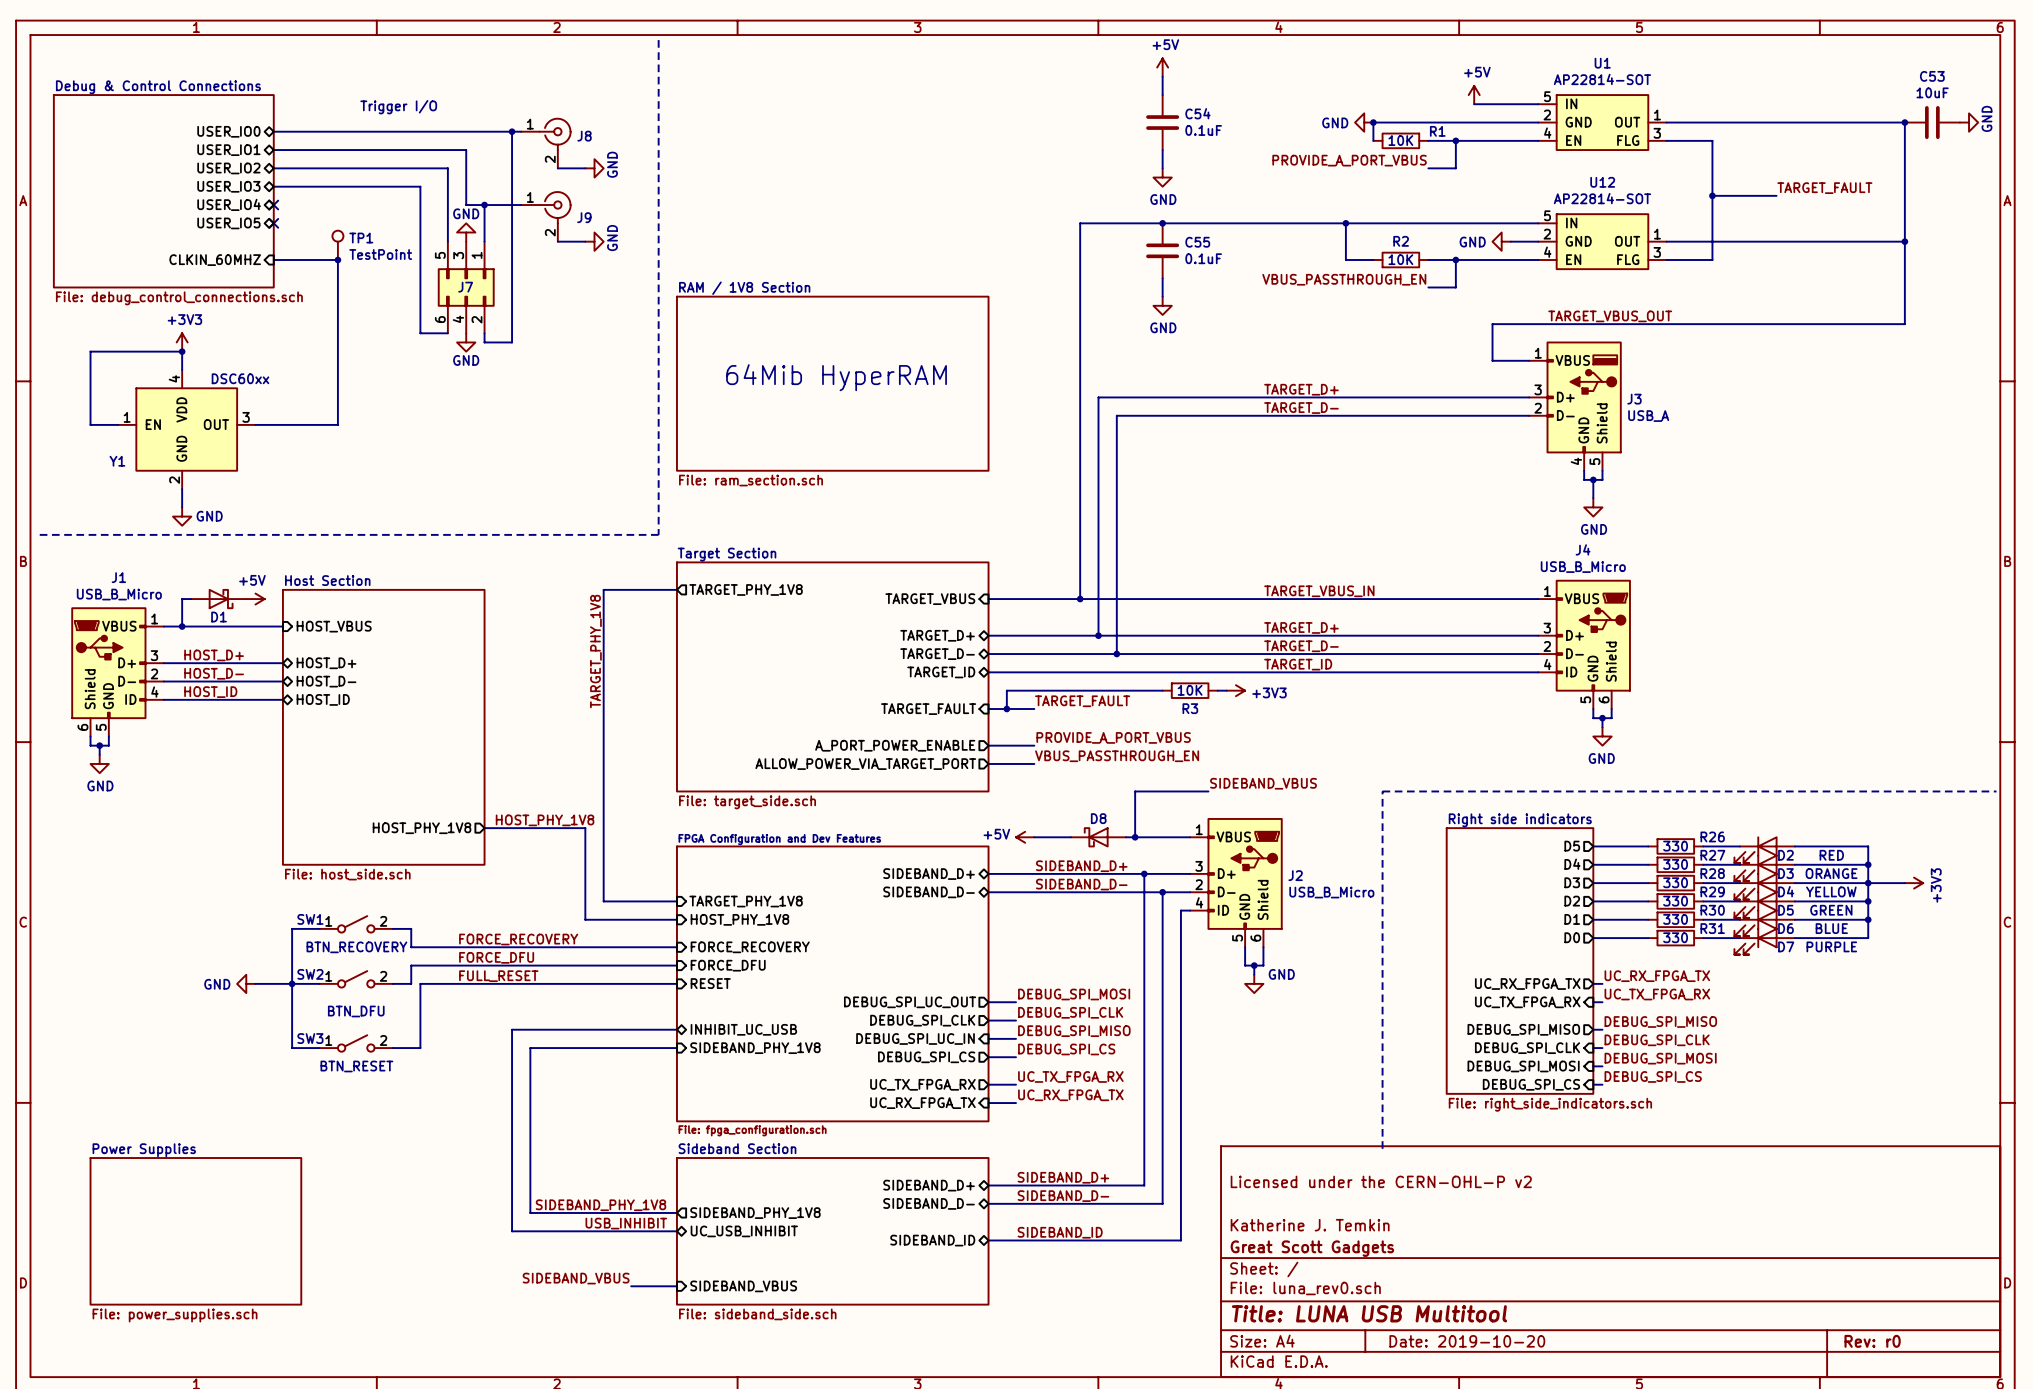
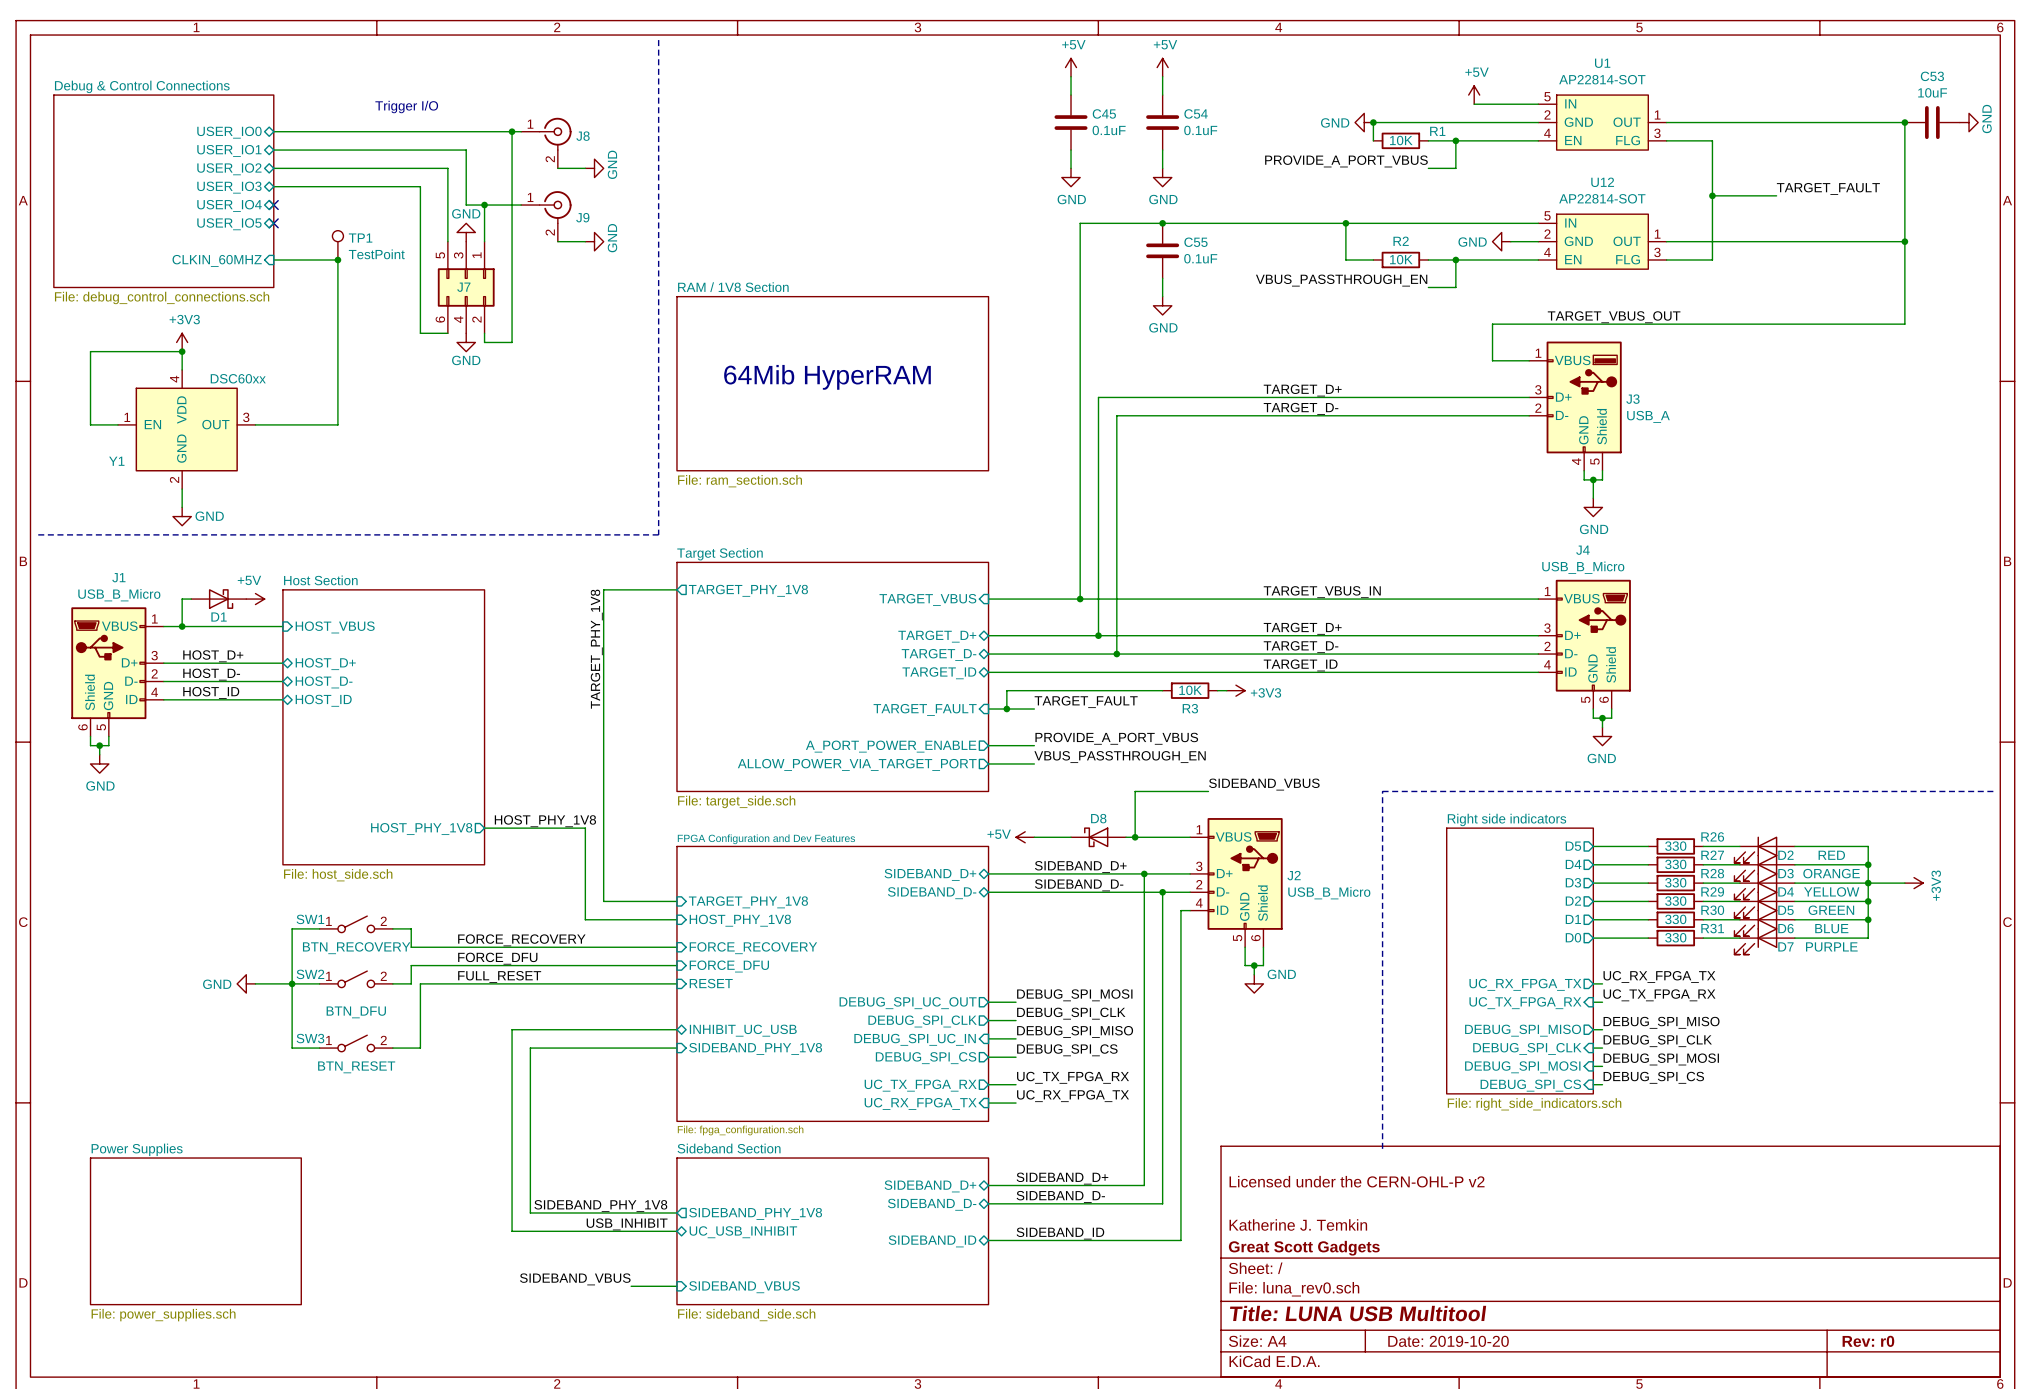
power symbol: none -> +5V (1071, 67)
wire: none -> (1071, 76) (1071, 95)
C45: none -> 0.1uF (1071, 122)
wire: none -> (1071, 150) (1071, 168)
power symbol: none -> GND (1071, 177)

